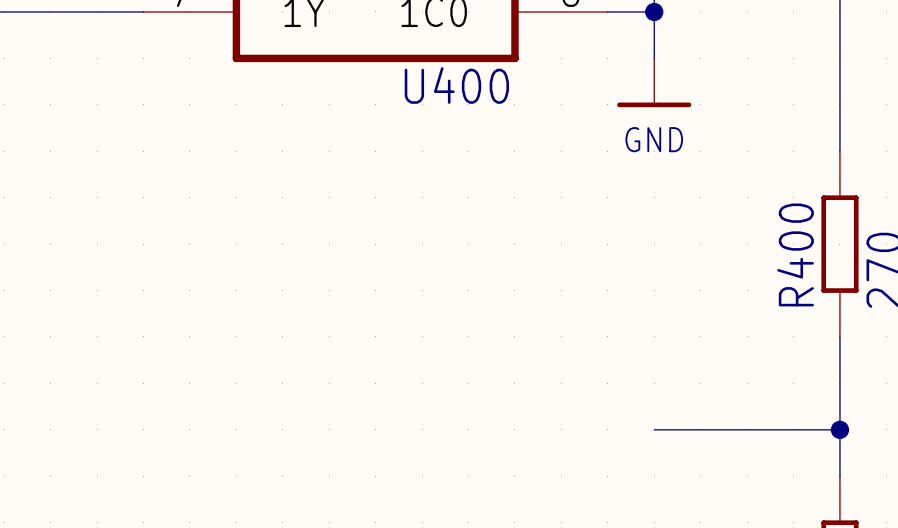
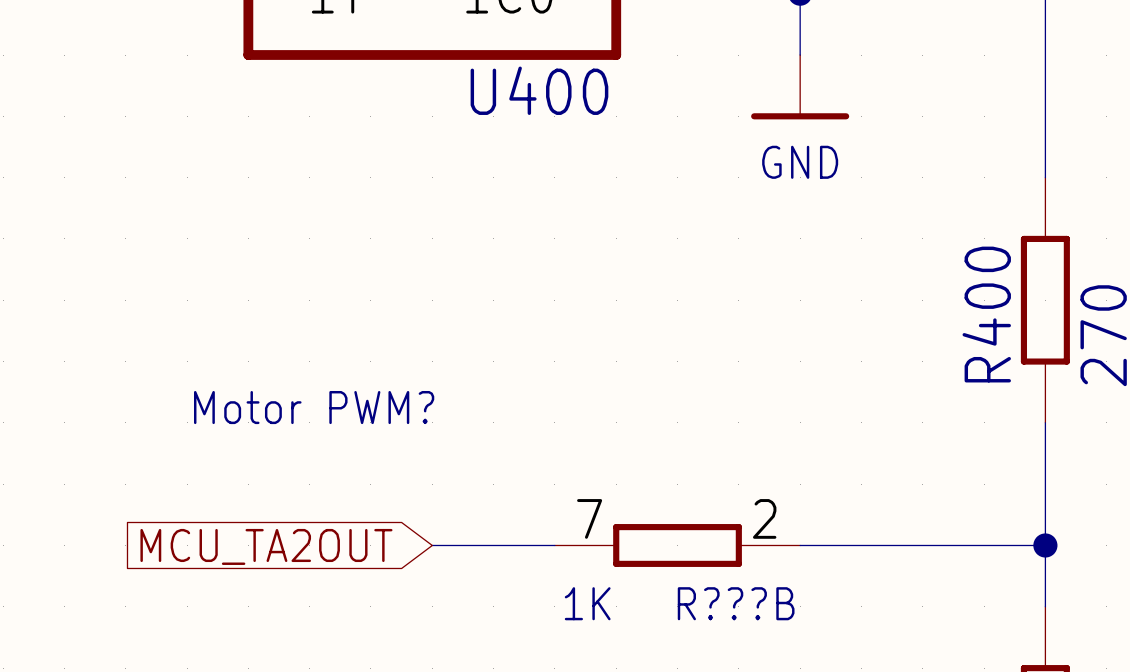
text: none -> Motor PWM? (314, 407)
wire: none -> (432, 545) (554, 545)
R???B: none -> 1K (677, 545)
global label: none -> MCU_TA2OUT (266, 546)

